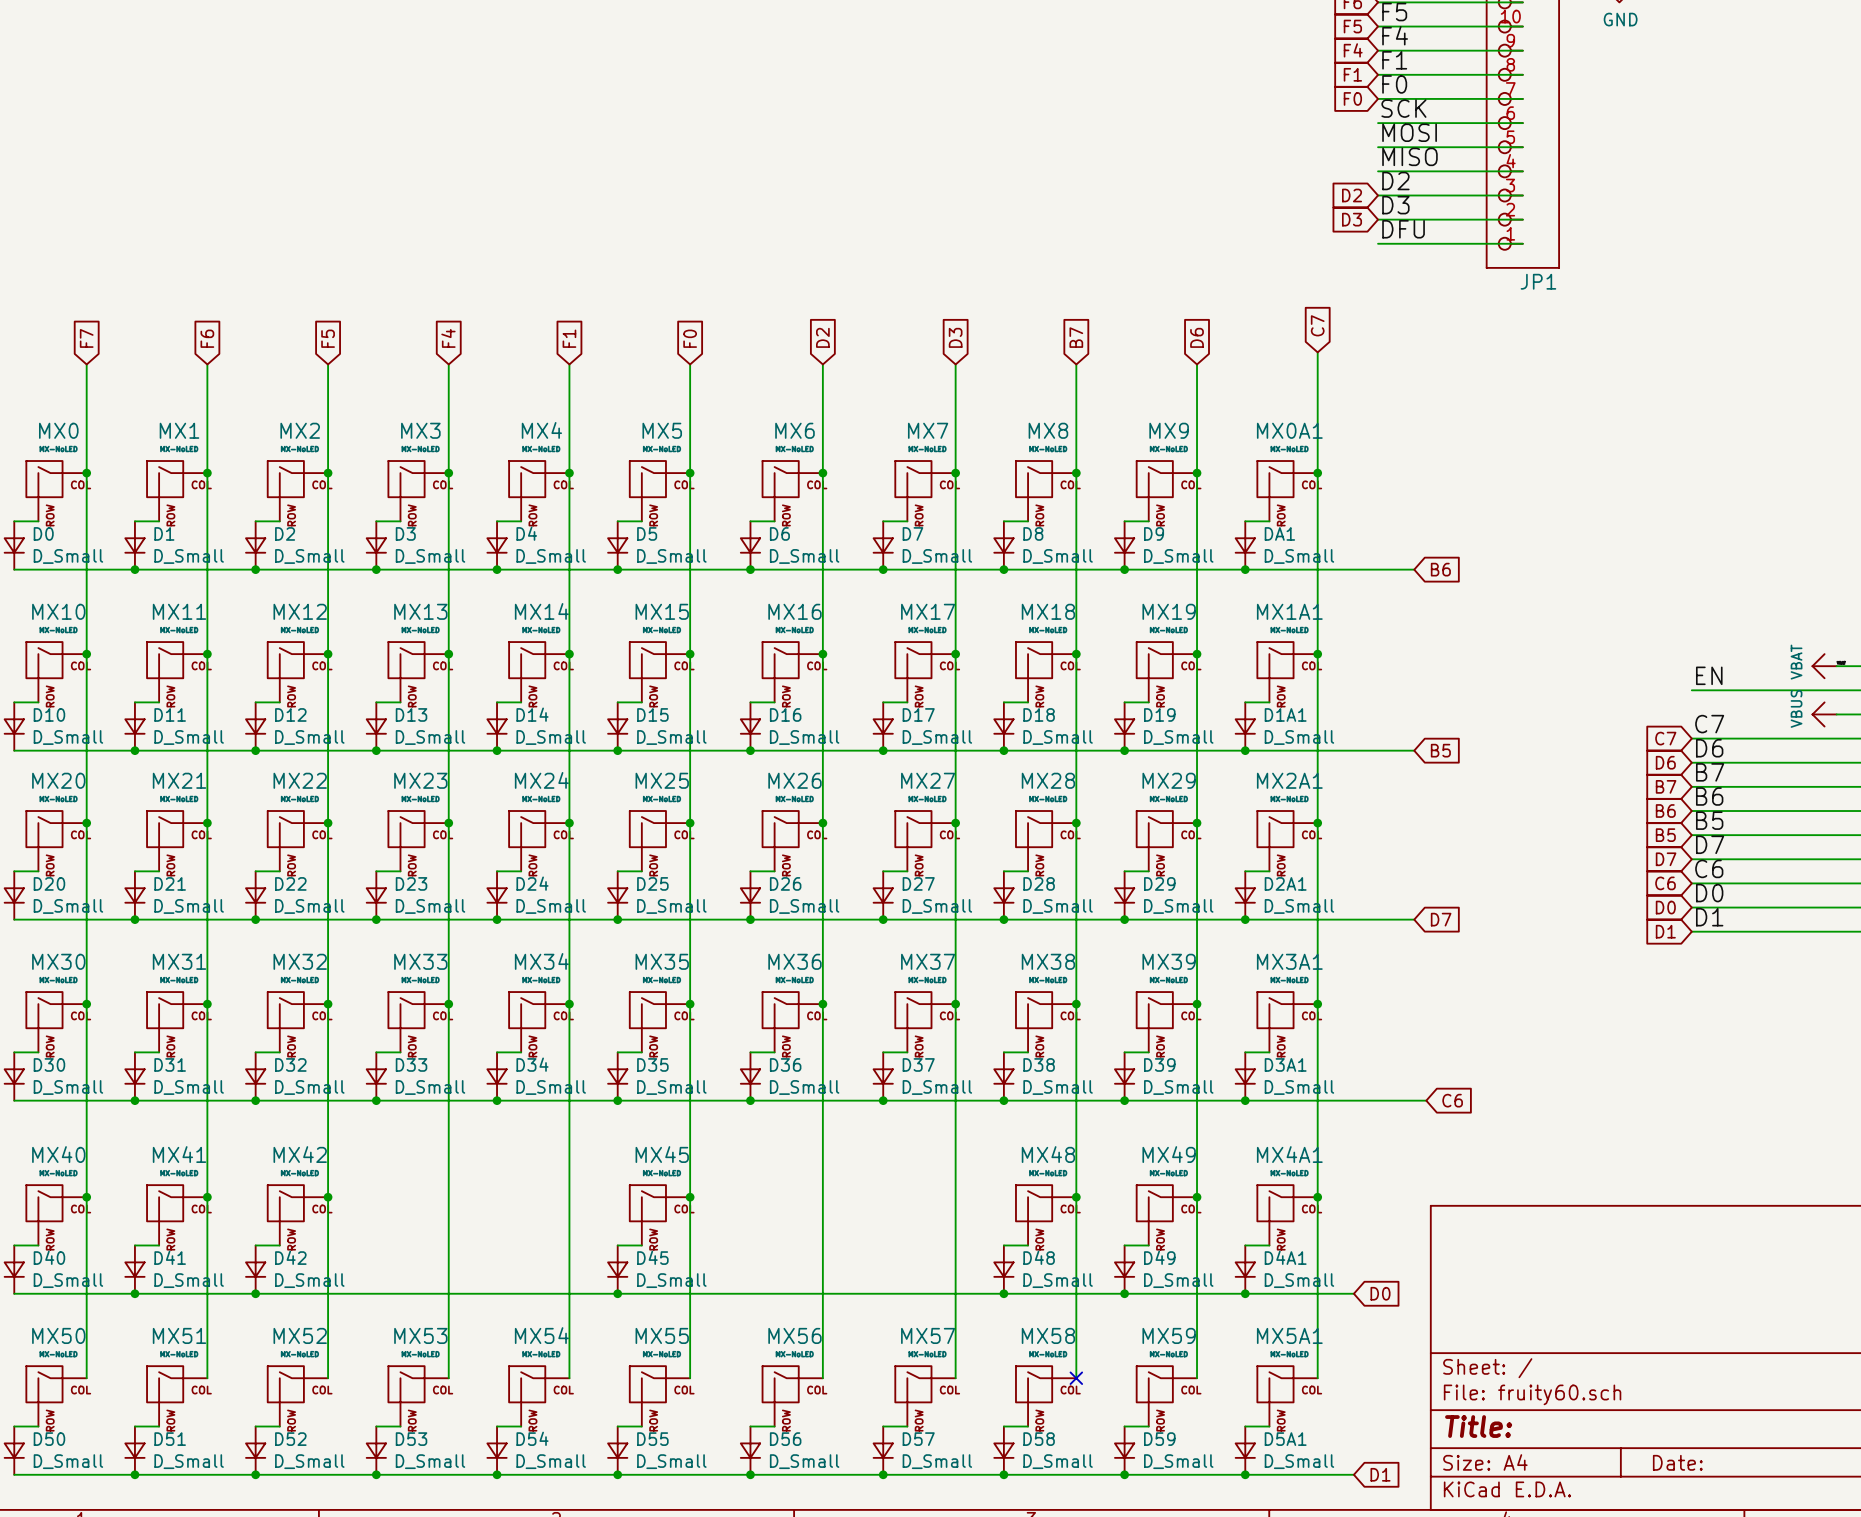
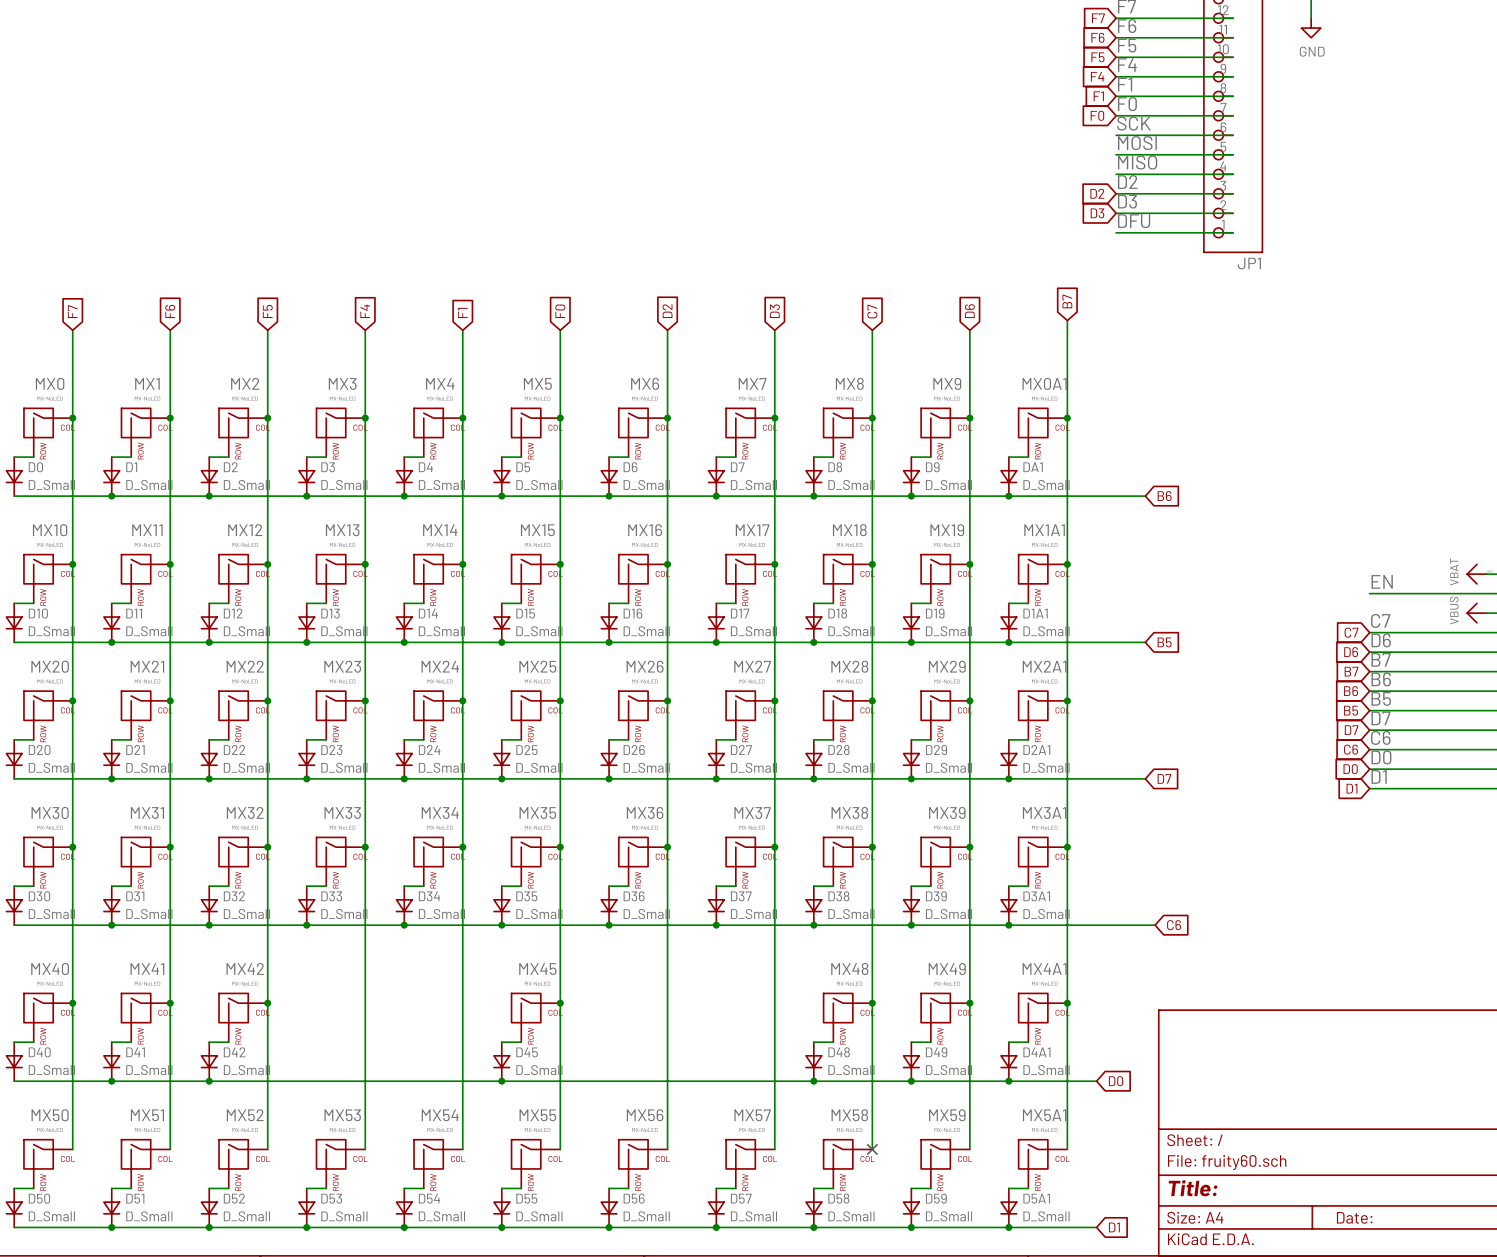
global label: C7 (1317, 325) -> B7 (1067, 301)
global label: B7 (1076, 337) -> C7 (872, 311)

